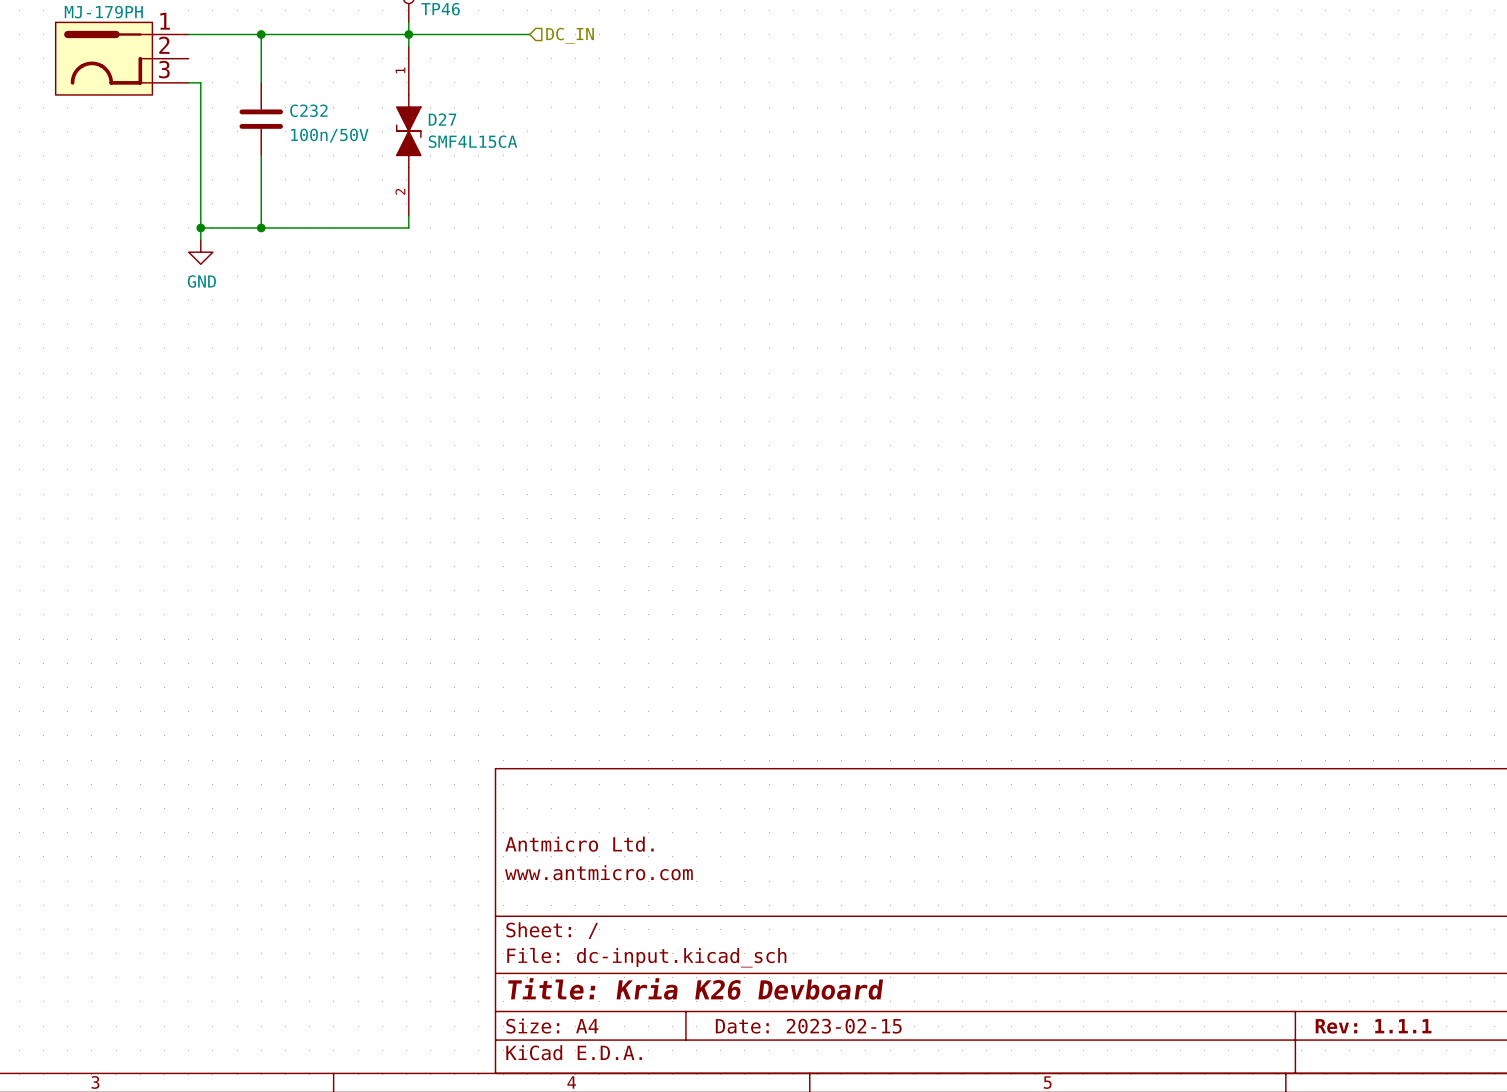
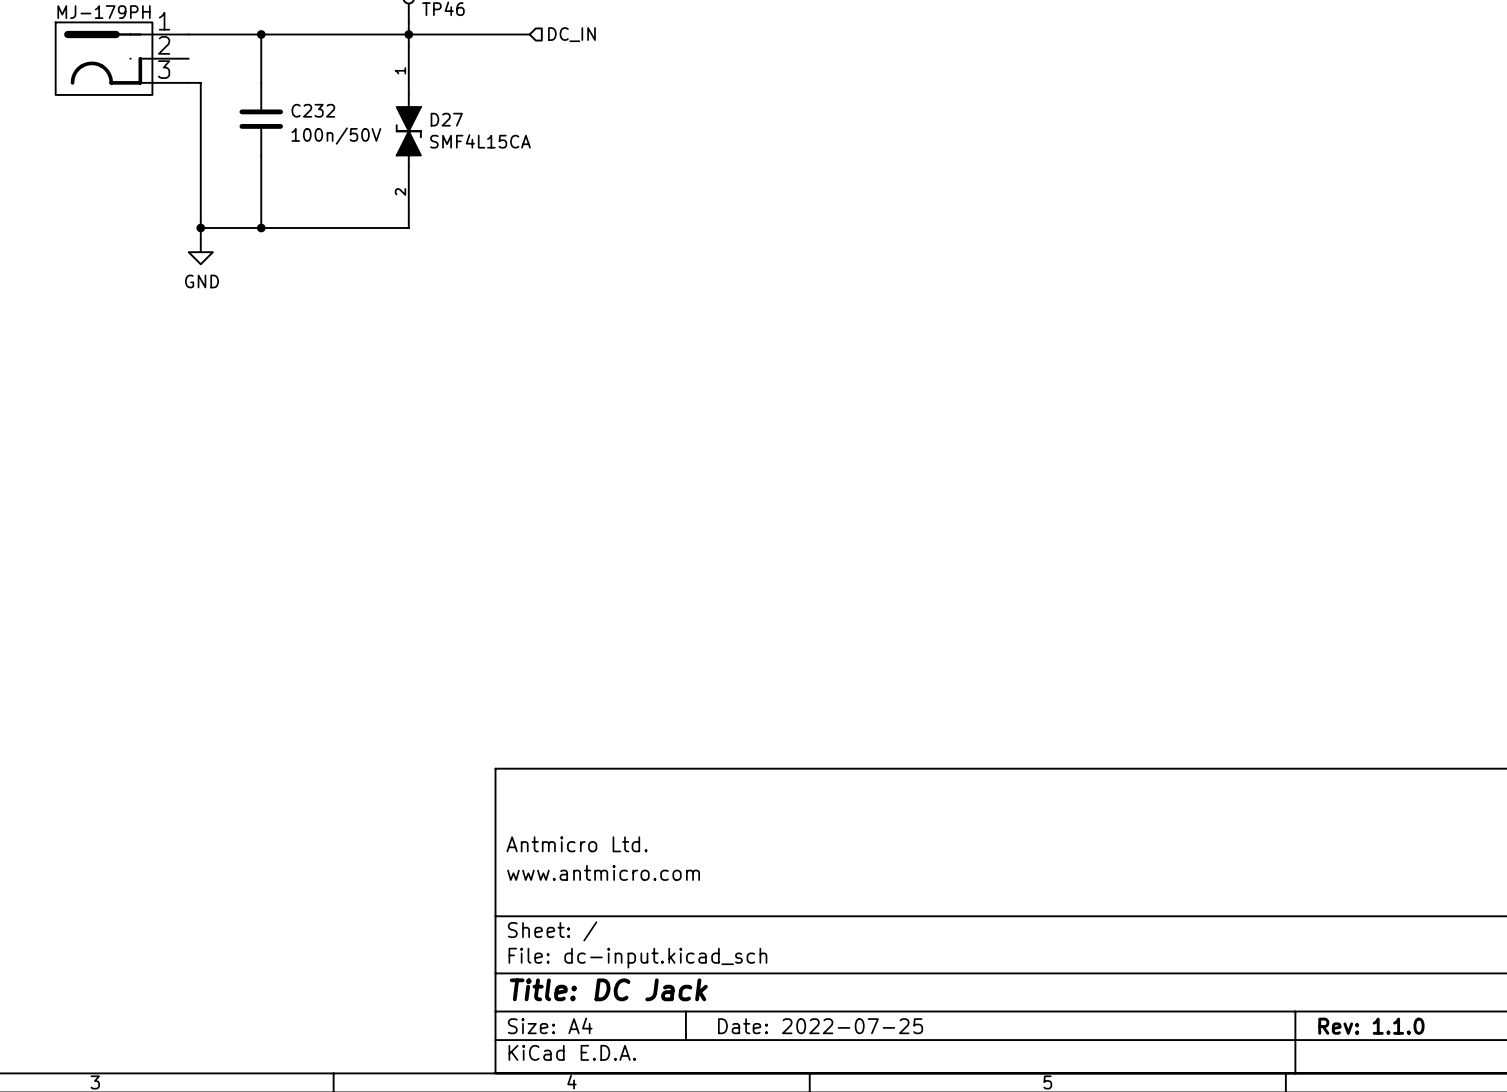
title block: Title: Kria K26 Devboard (695, 988) -> Title: DC Jack (608, 989)
title block: Date: 2023-02-15 (808, 1026) -> Date: 2022-07-25 (820, 1026)
title block: Rev: 1.1.1 (1373, 1026) -> Rev: 1.1.0 (1371, 1026)

